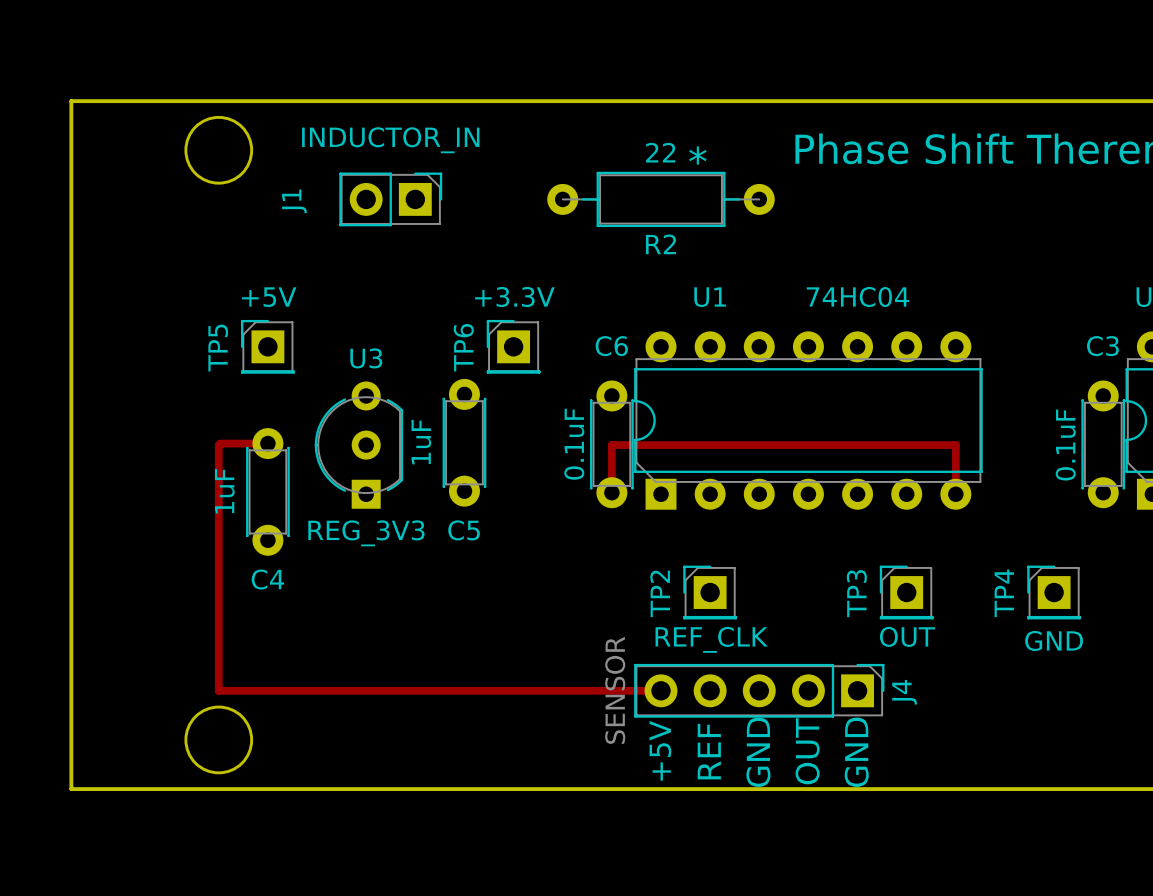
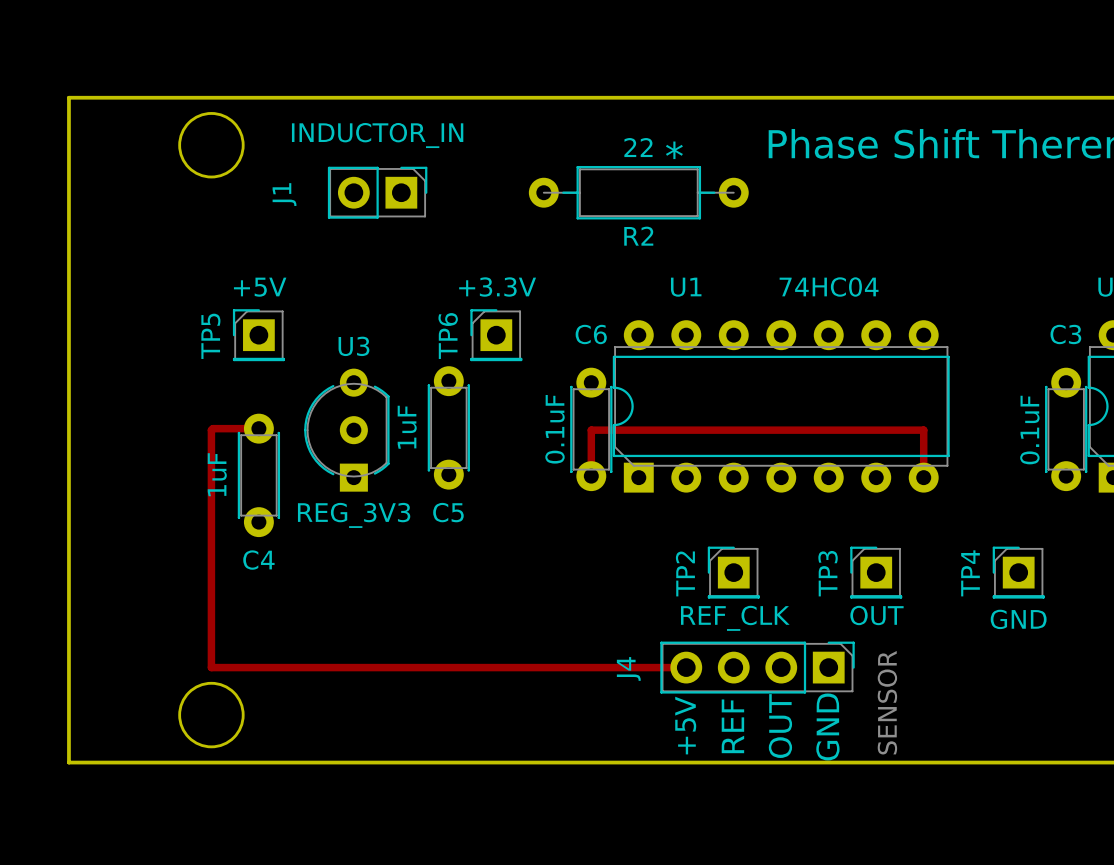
TP2 position: (710, 592) -> (733, 572)
J4 footprint: [634, 663, 885, 718] -> [660, 641, 855, 694]
J4 value position: SENSOR (615, 690) -> SENSOR (887, 702)
track: none -> (638, 667) (686, 667)
J4 name position: J4 (904, 692) -> J4 (628, 668)
text: +5V (660, 750) -> none
text: REF (709, 751) -> +5V (685, 725)
text: GND (758, 752) -> REF (732, 726)

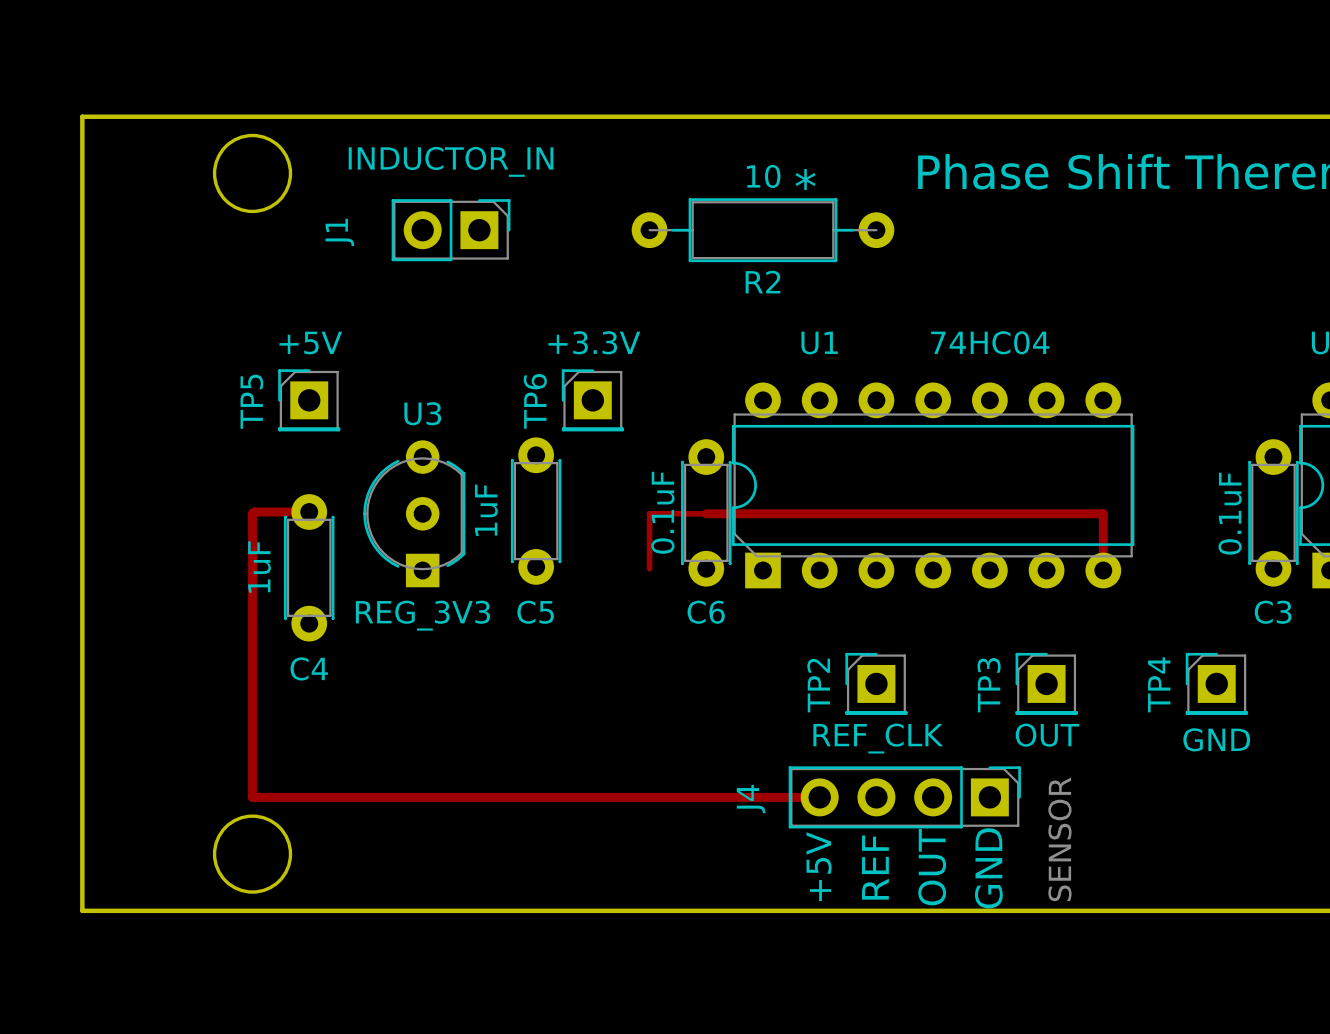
R2 value: 22 (638, 147) -> 10 (763, 176)
C6 name position: C6 (591, 334) -> C6 (706, 612)
C3 name position: C3 (1065, 334) -> C3 (1273, 612)
track: (591, 430) (591, 476) -> (706, 513) (649, 513) (649, 568)

